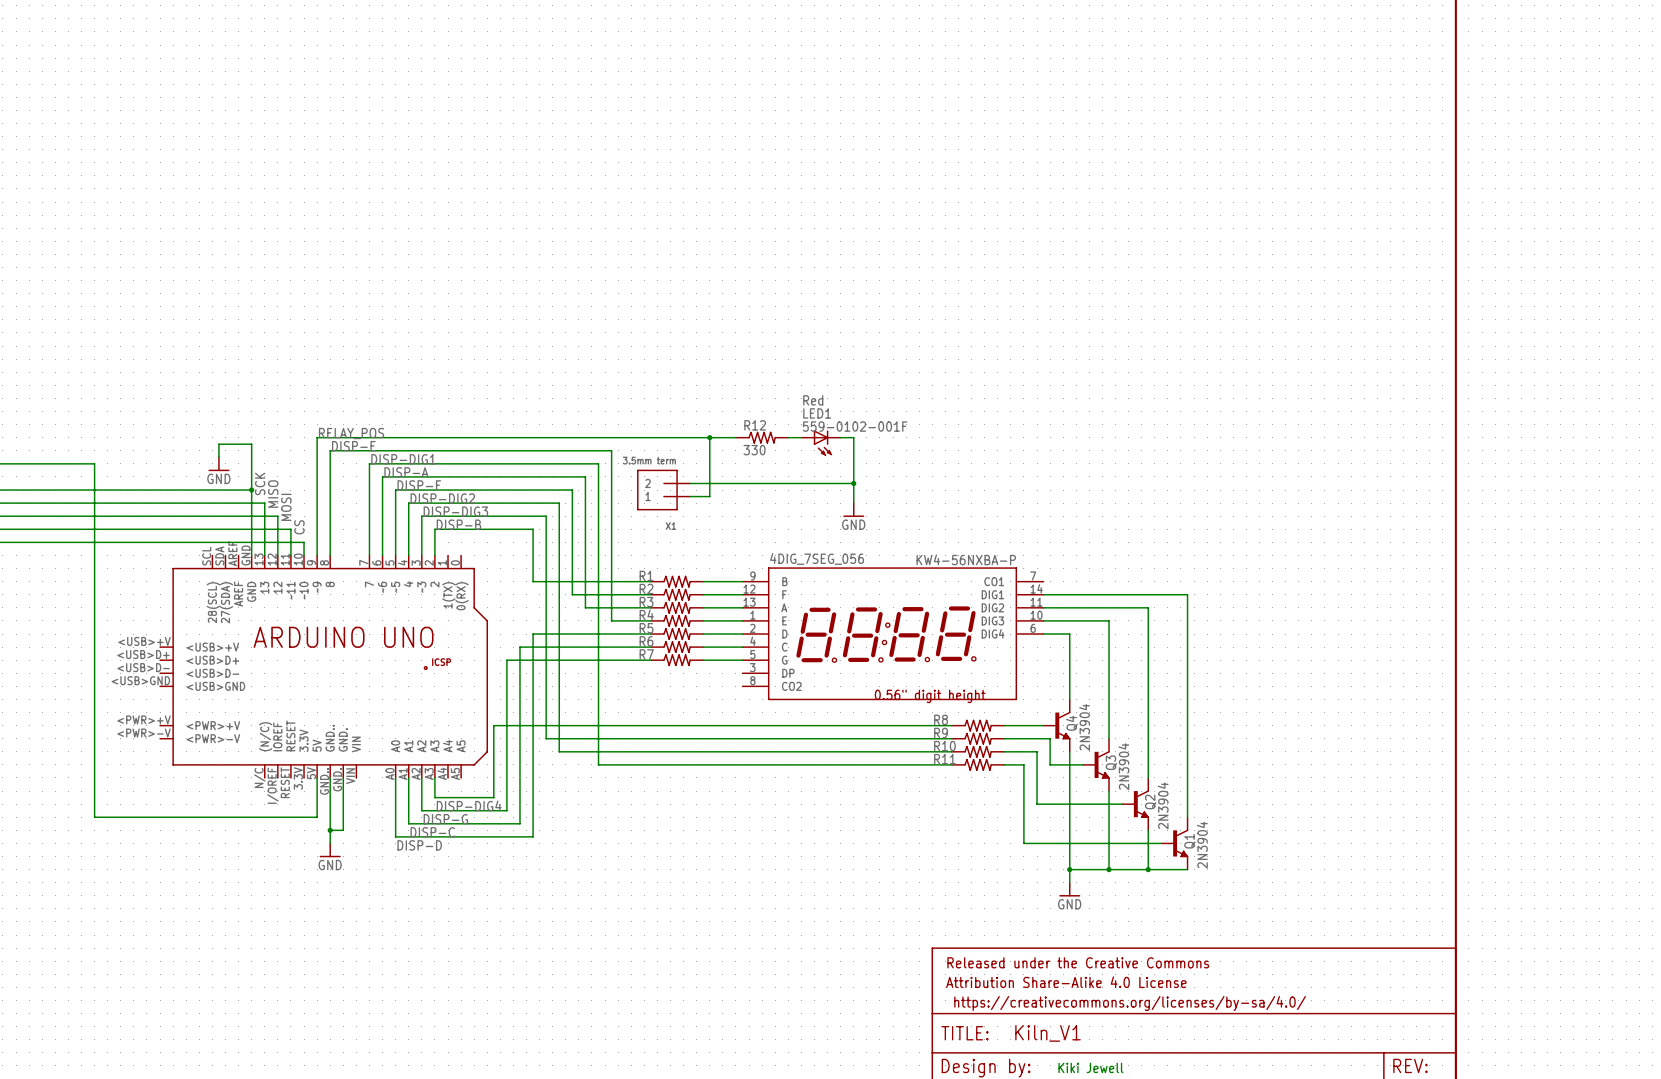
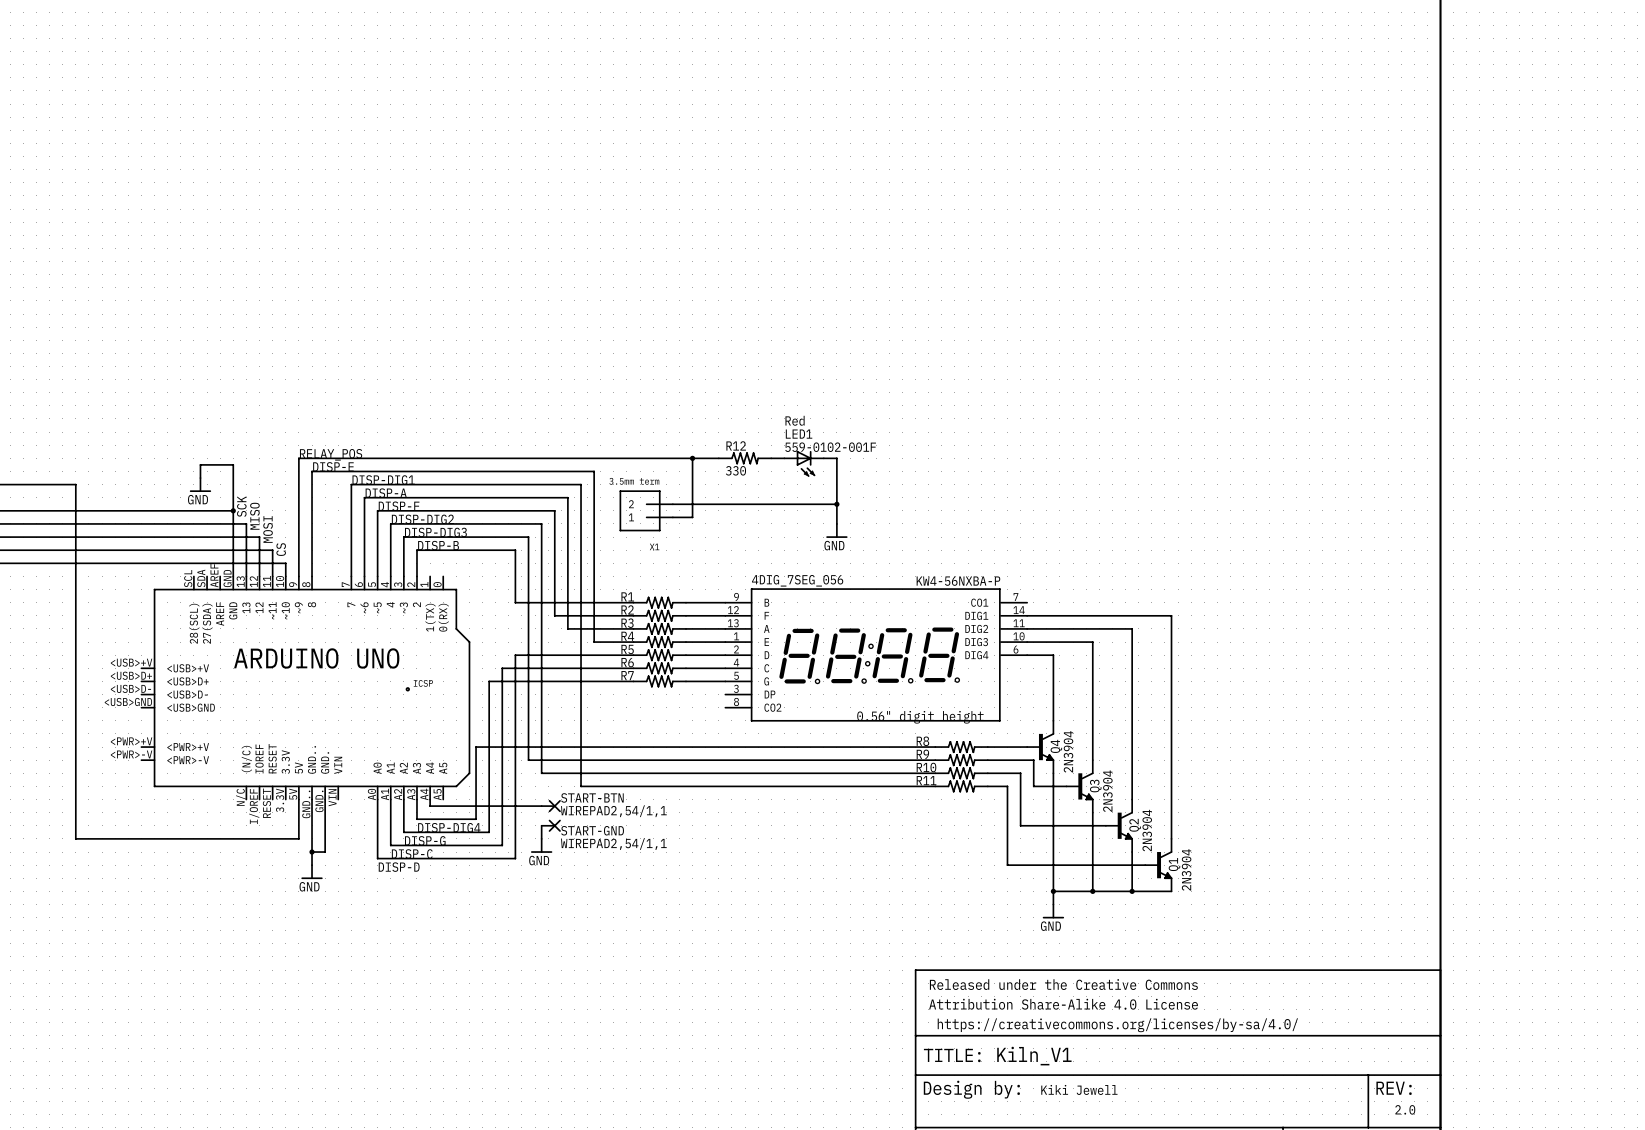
wire: none -> (430, 799) (430, 806) (541, 806)
START-BTN: none -> WIREPAD2,54/1,1 (551, 806)
wire: none -> (541, 825) (541, 838)
START-GND: none -> WIREPAD2,54/1,1 (551, 825)
power symbol: none -> GND (541, 845)

